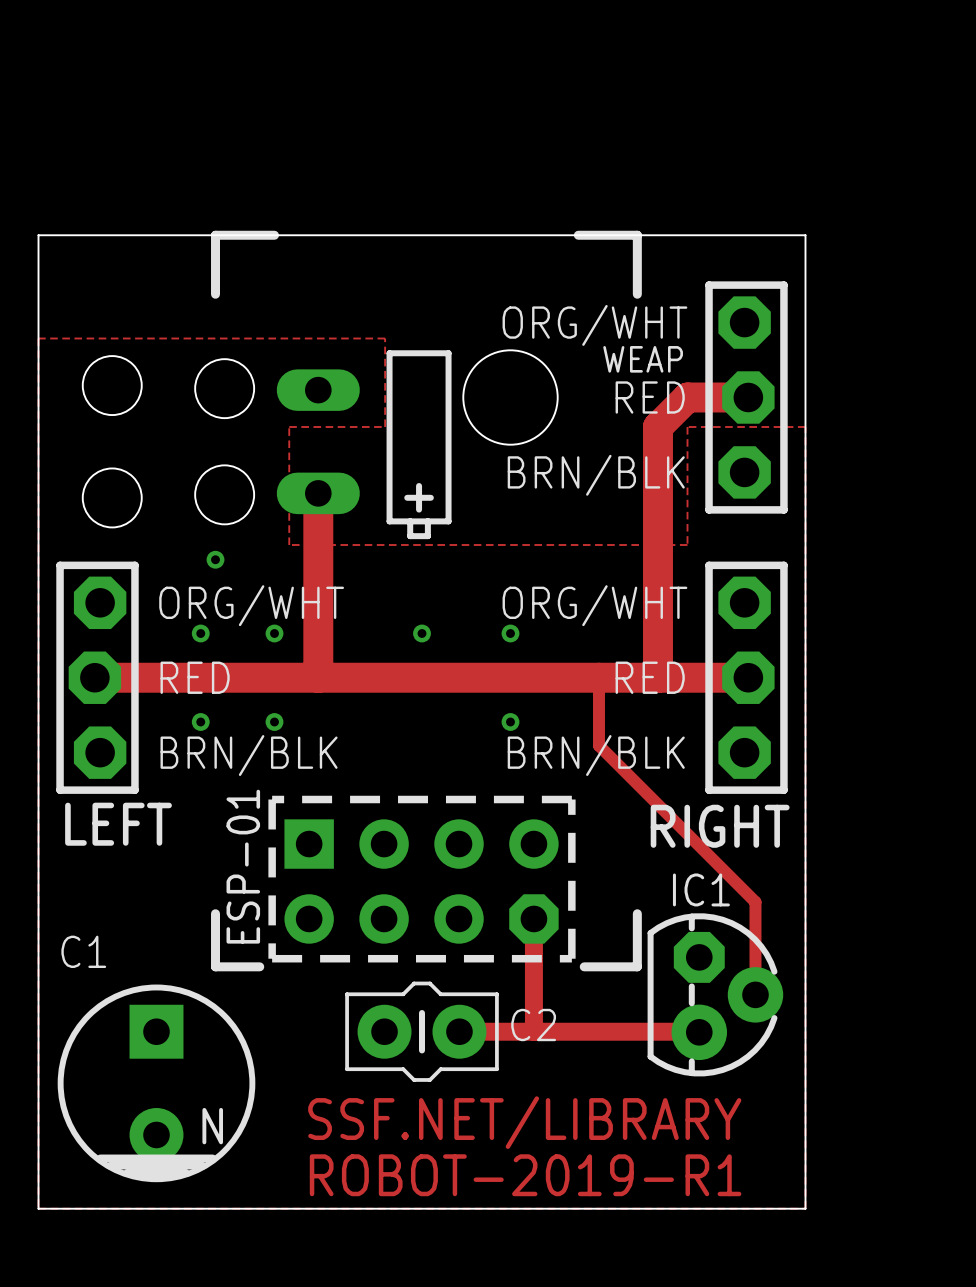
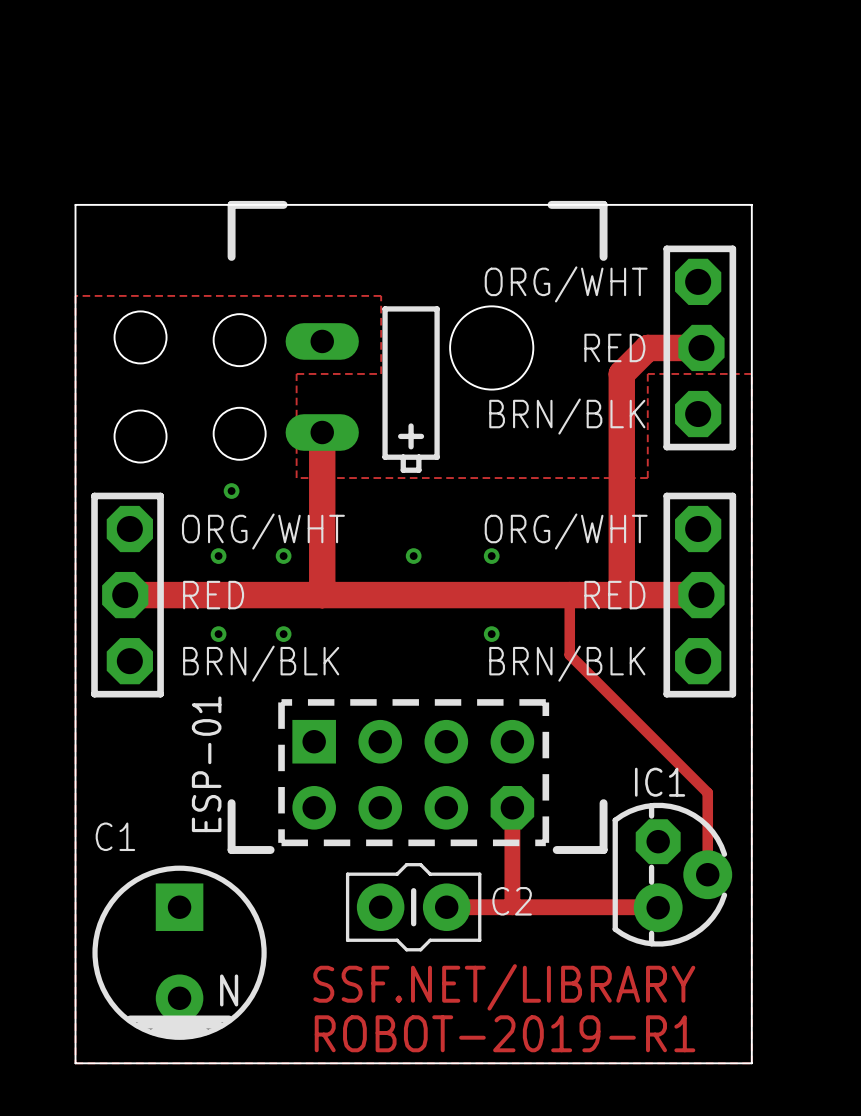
text: WEAP (643, 359) -> none
text: LEFT (118, 824) -> none
text: RIGHT (720, 826) -> none
text position: ESP-01 (243, 866) -> ESP-01 (206, 764)

